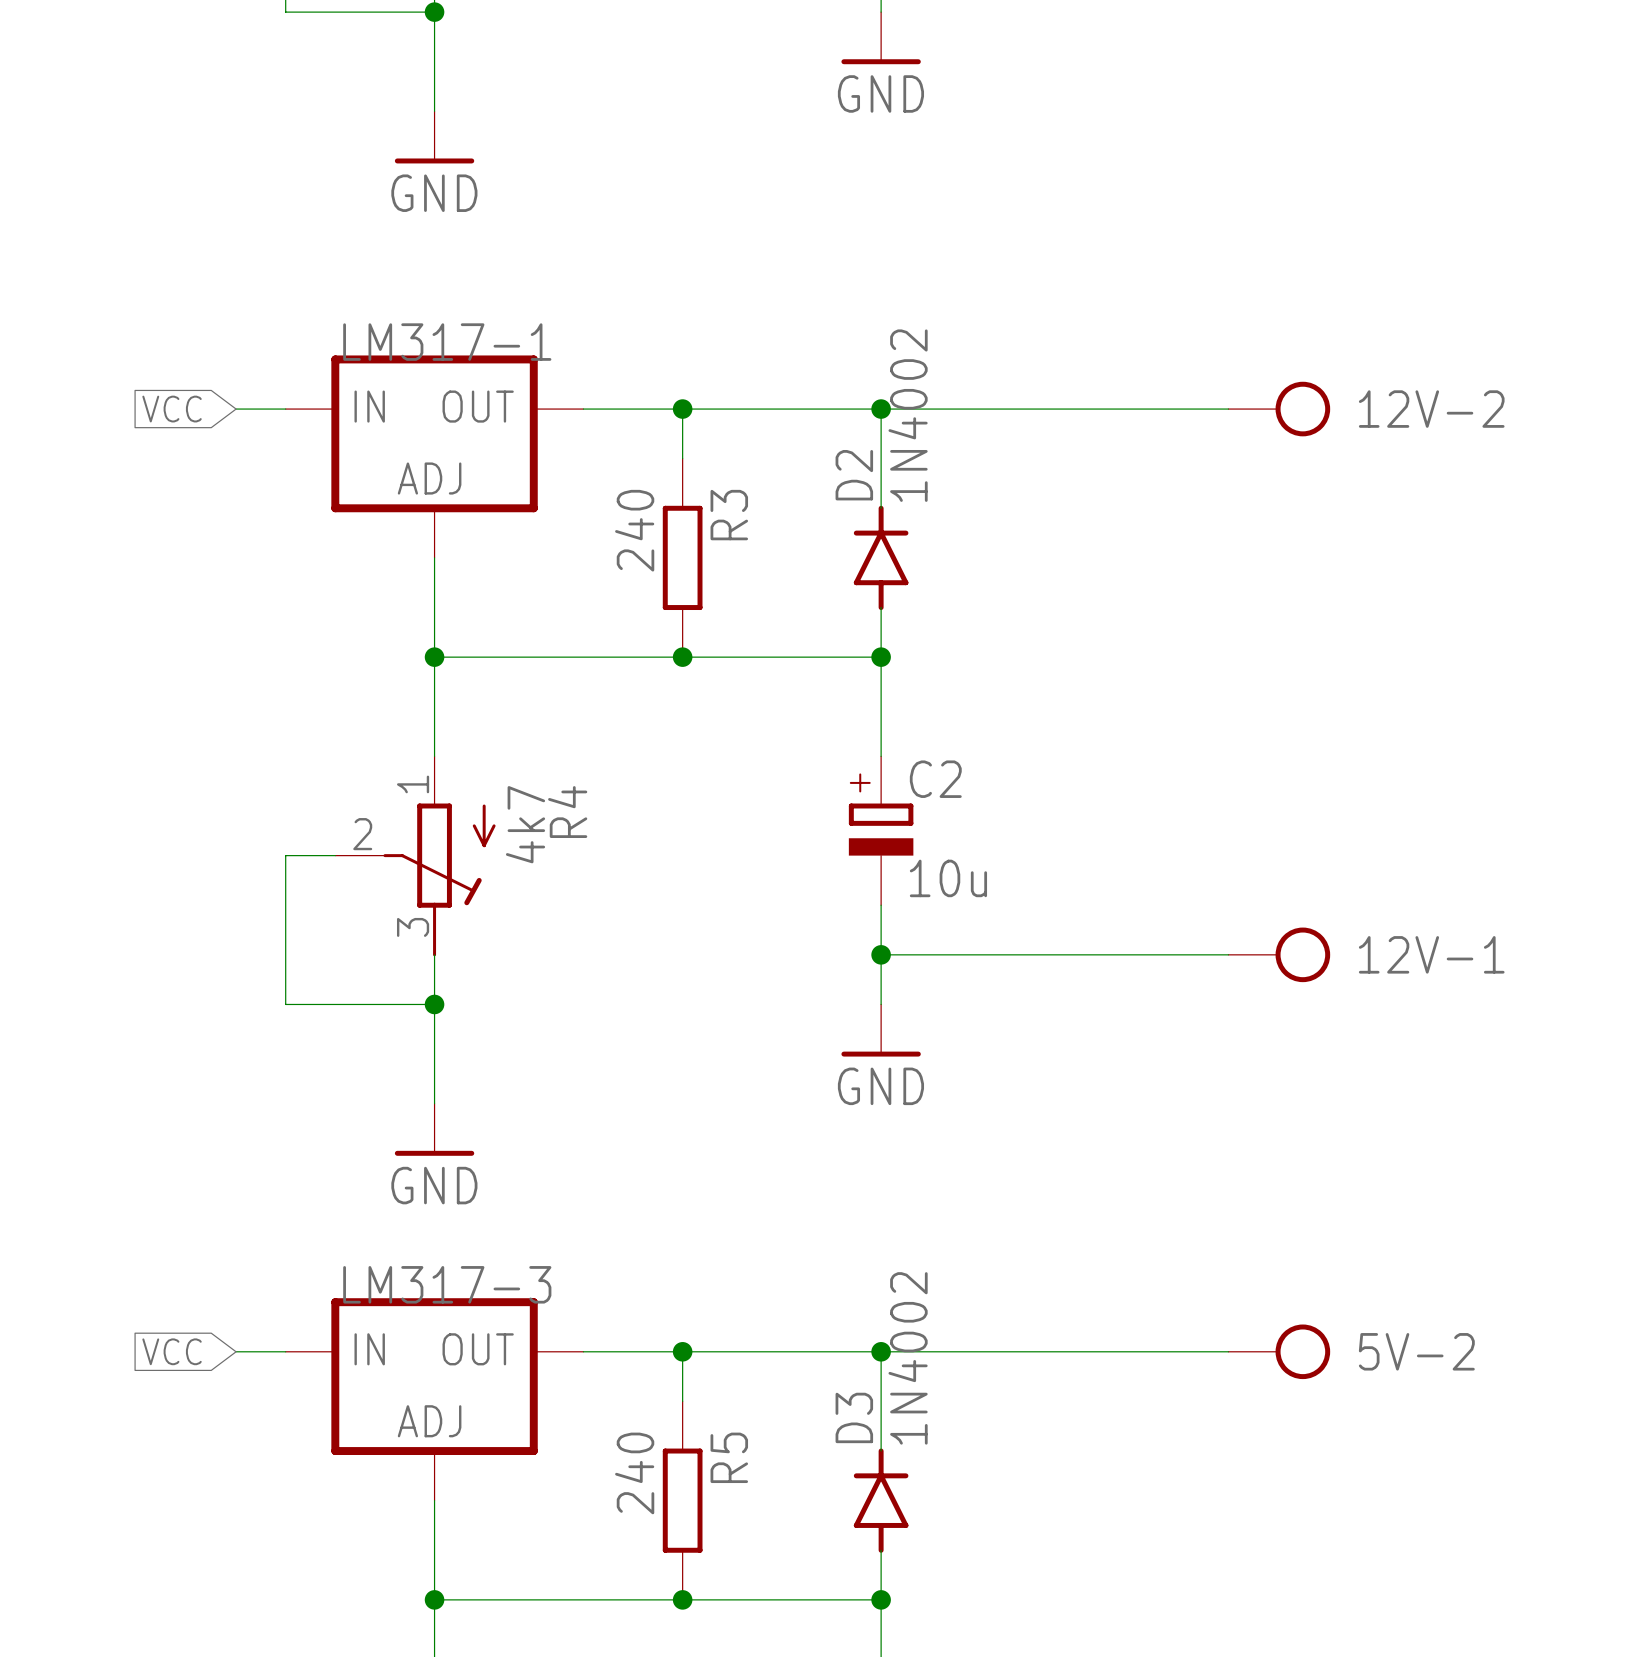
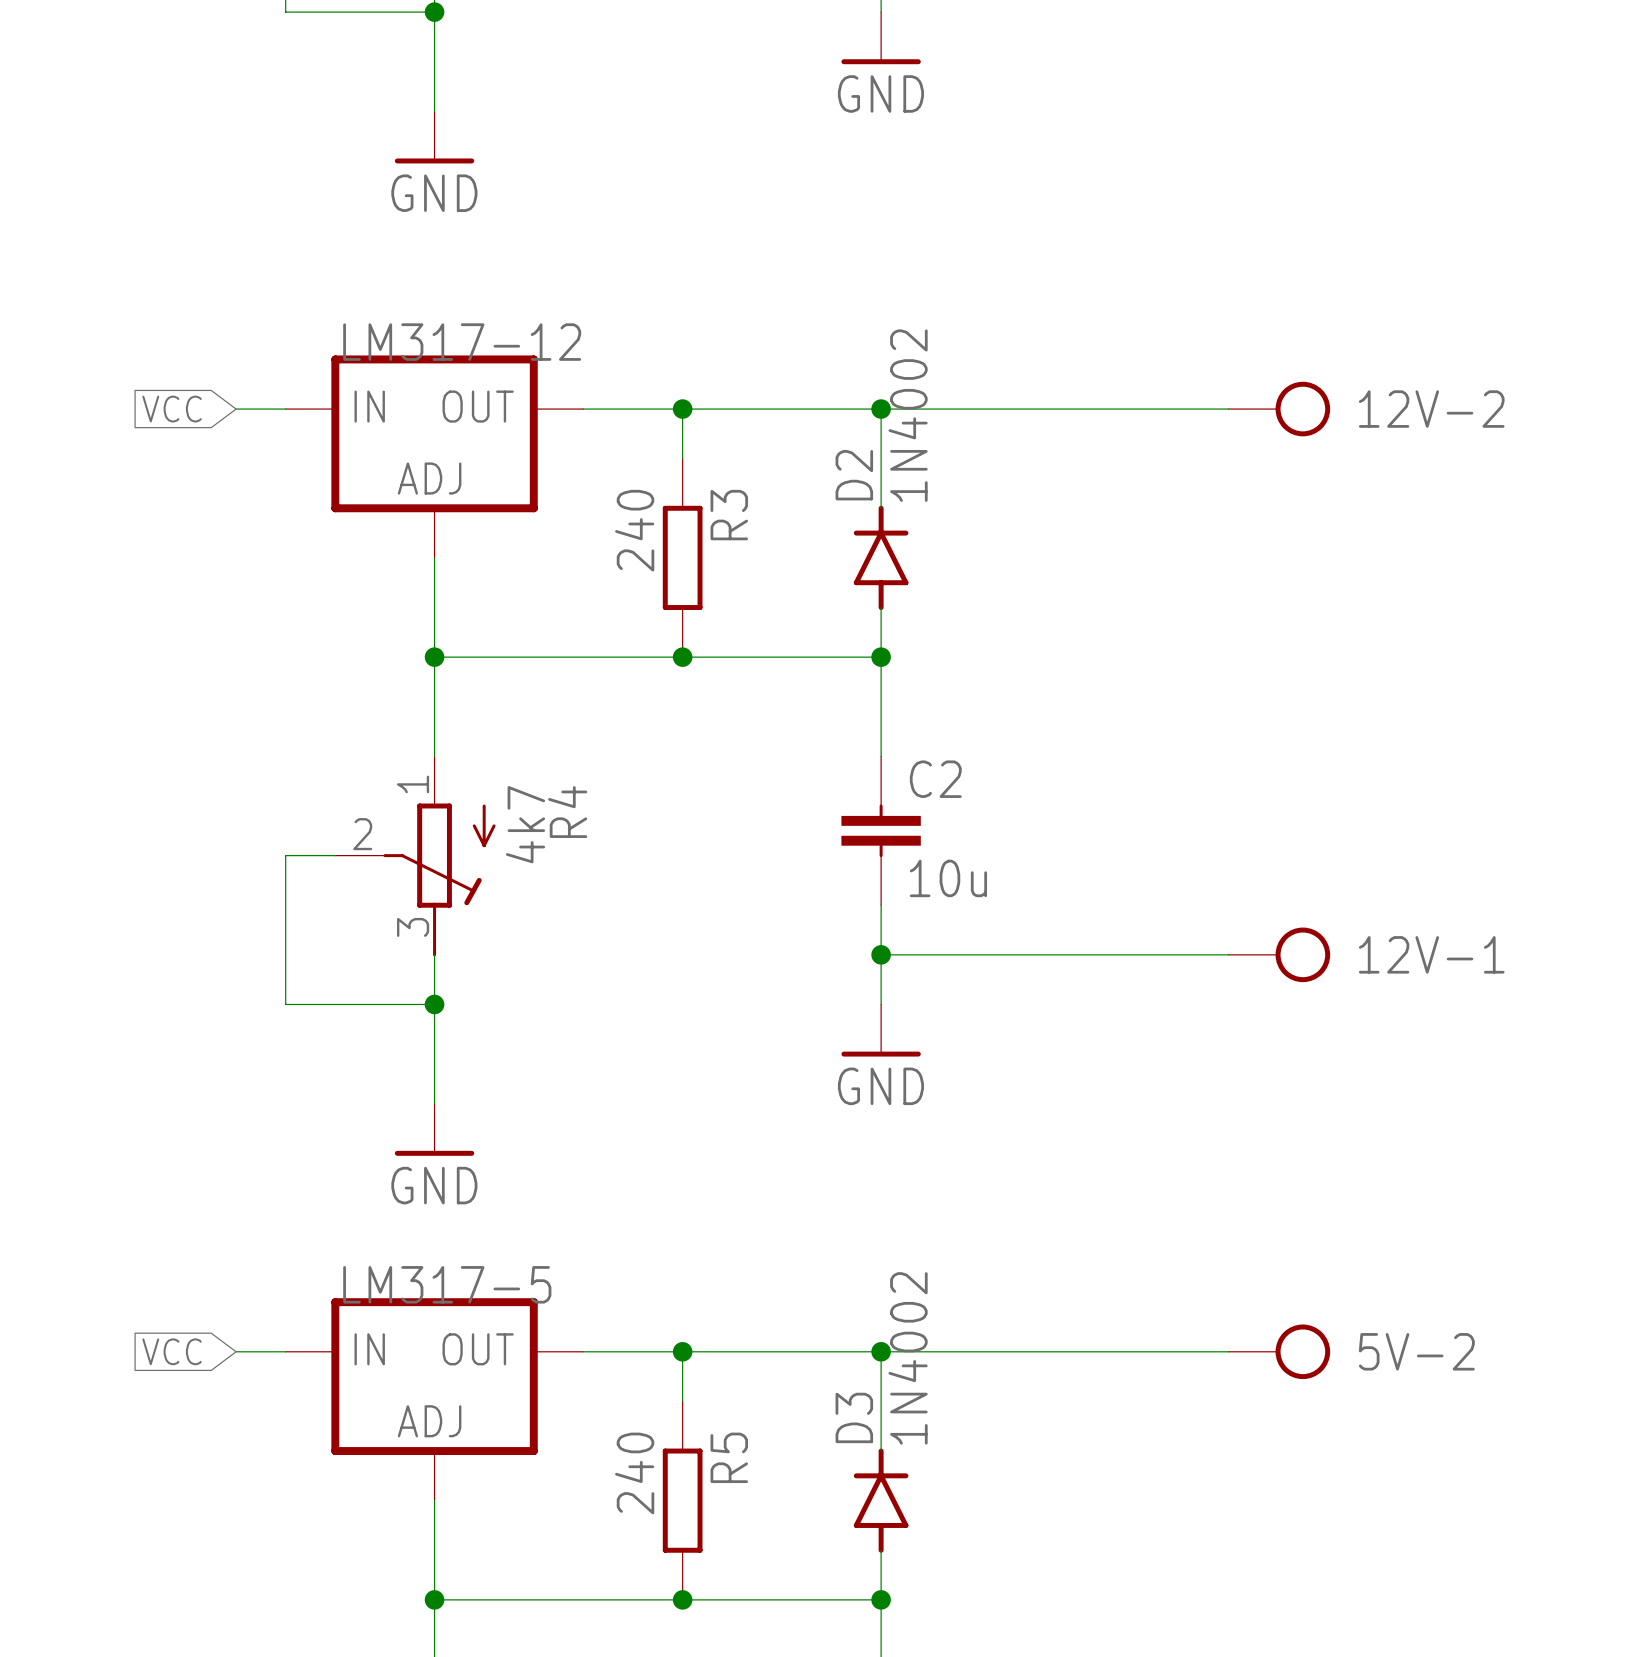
LM317-1 name: LM317-1 (447, 342) -> LM317-12 (462, 342)
C2 symbol: [848, 756, 914, 906] -> [841, 756, 921, 906]
LM317-3 name: LM317-3 (447, 1284) -> LM317-5 (447, 1284)

